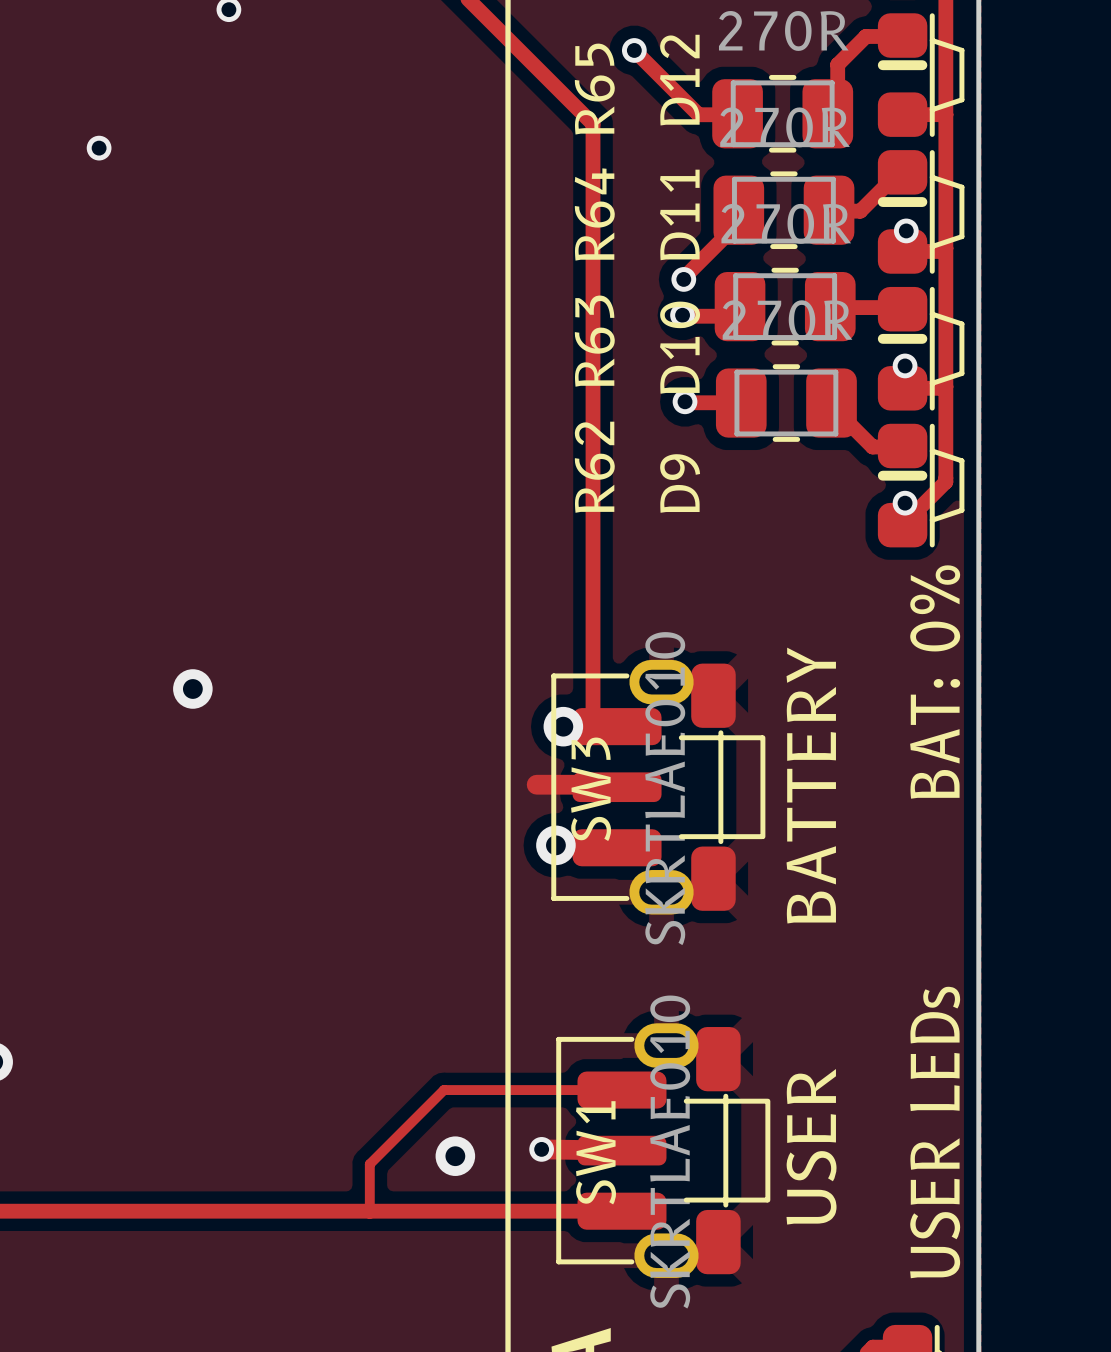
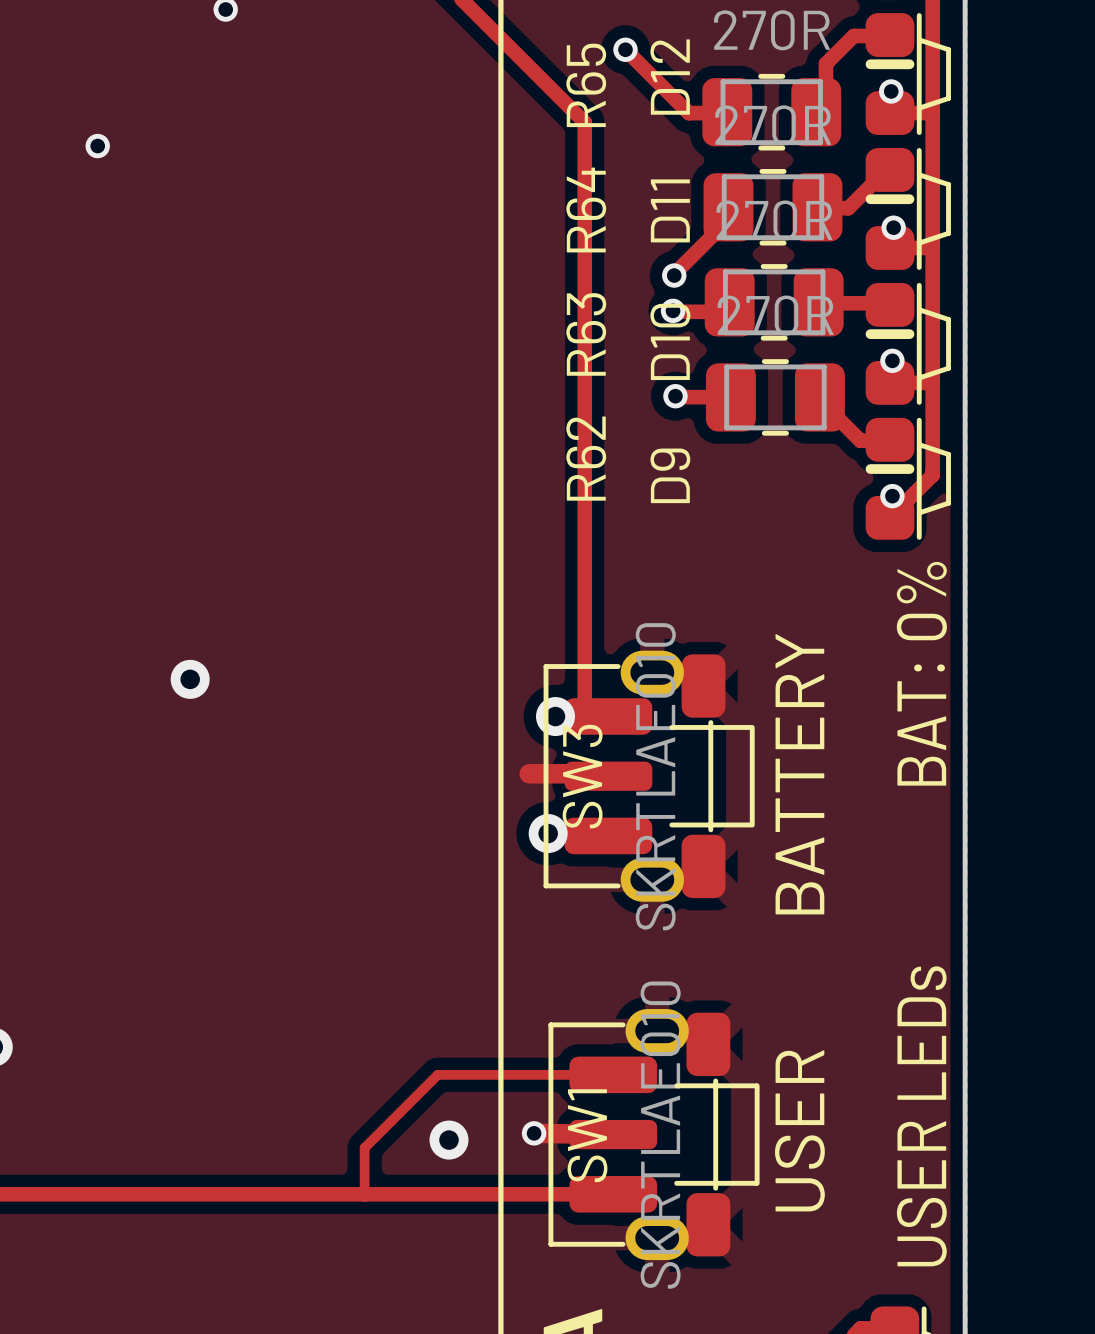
via: none -> (891, 91)

